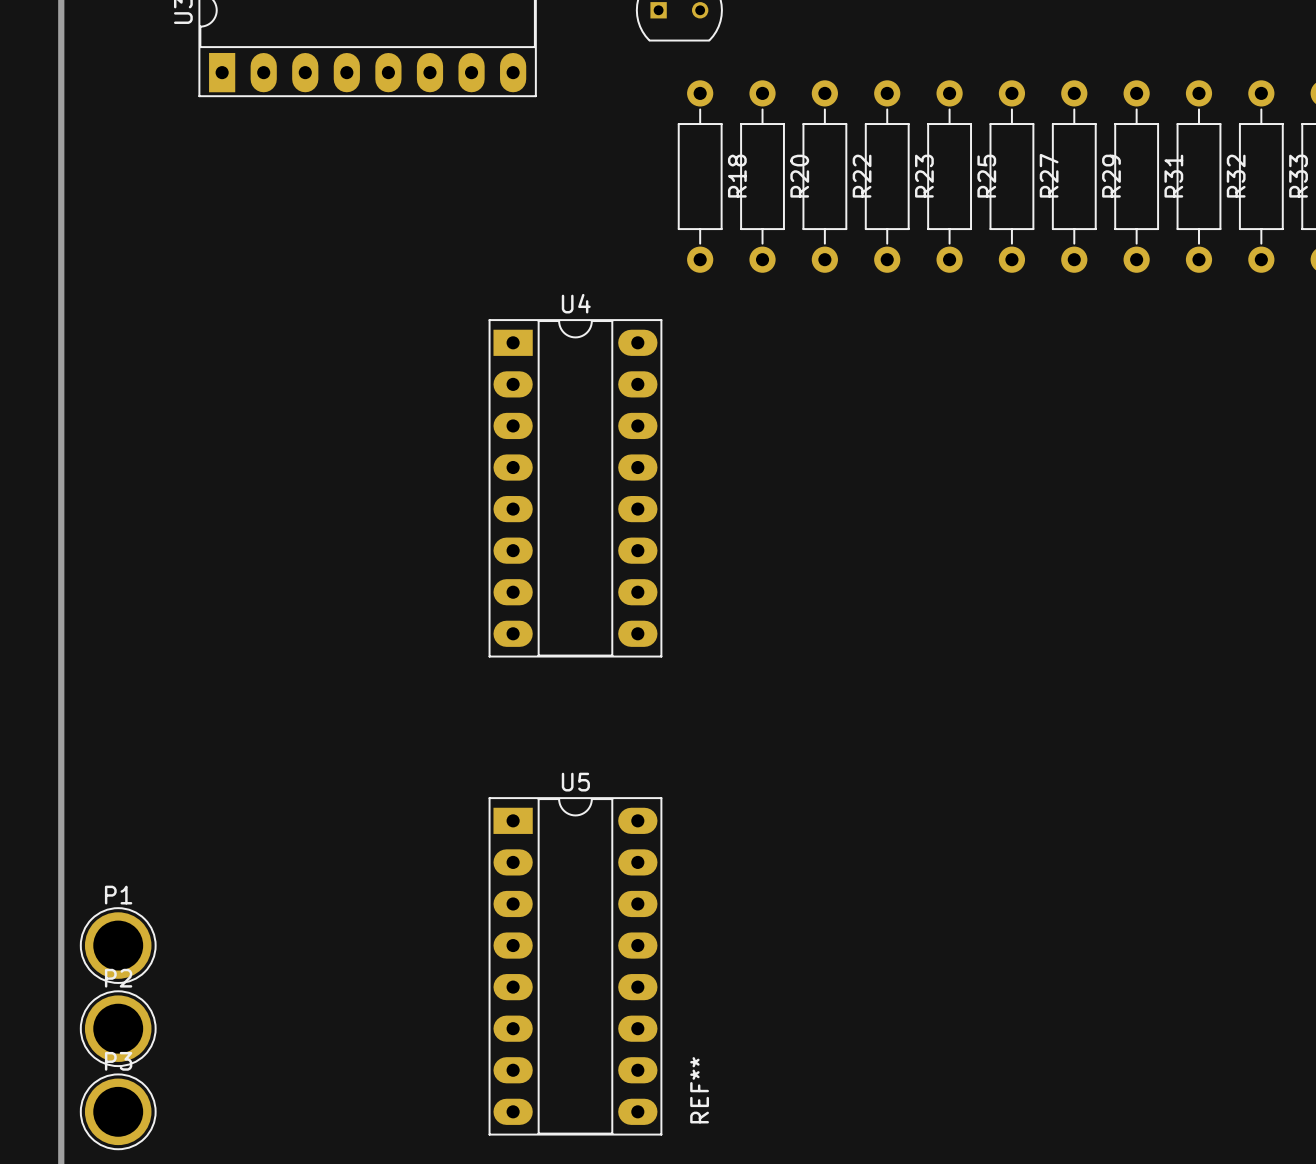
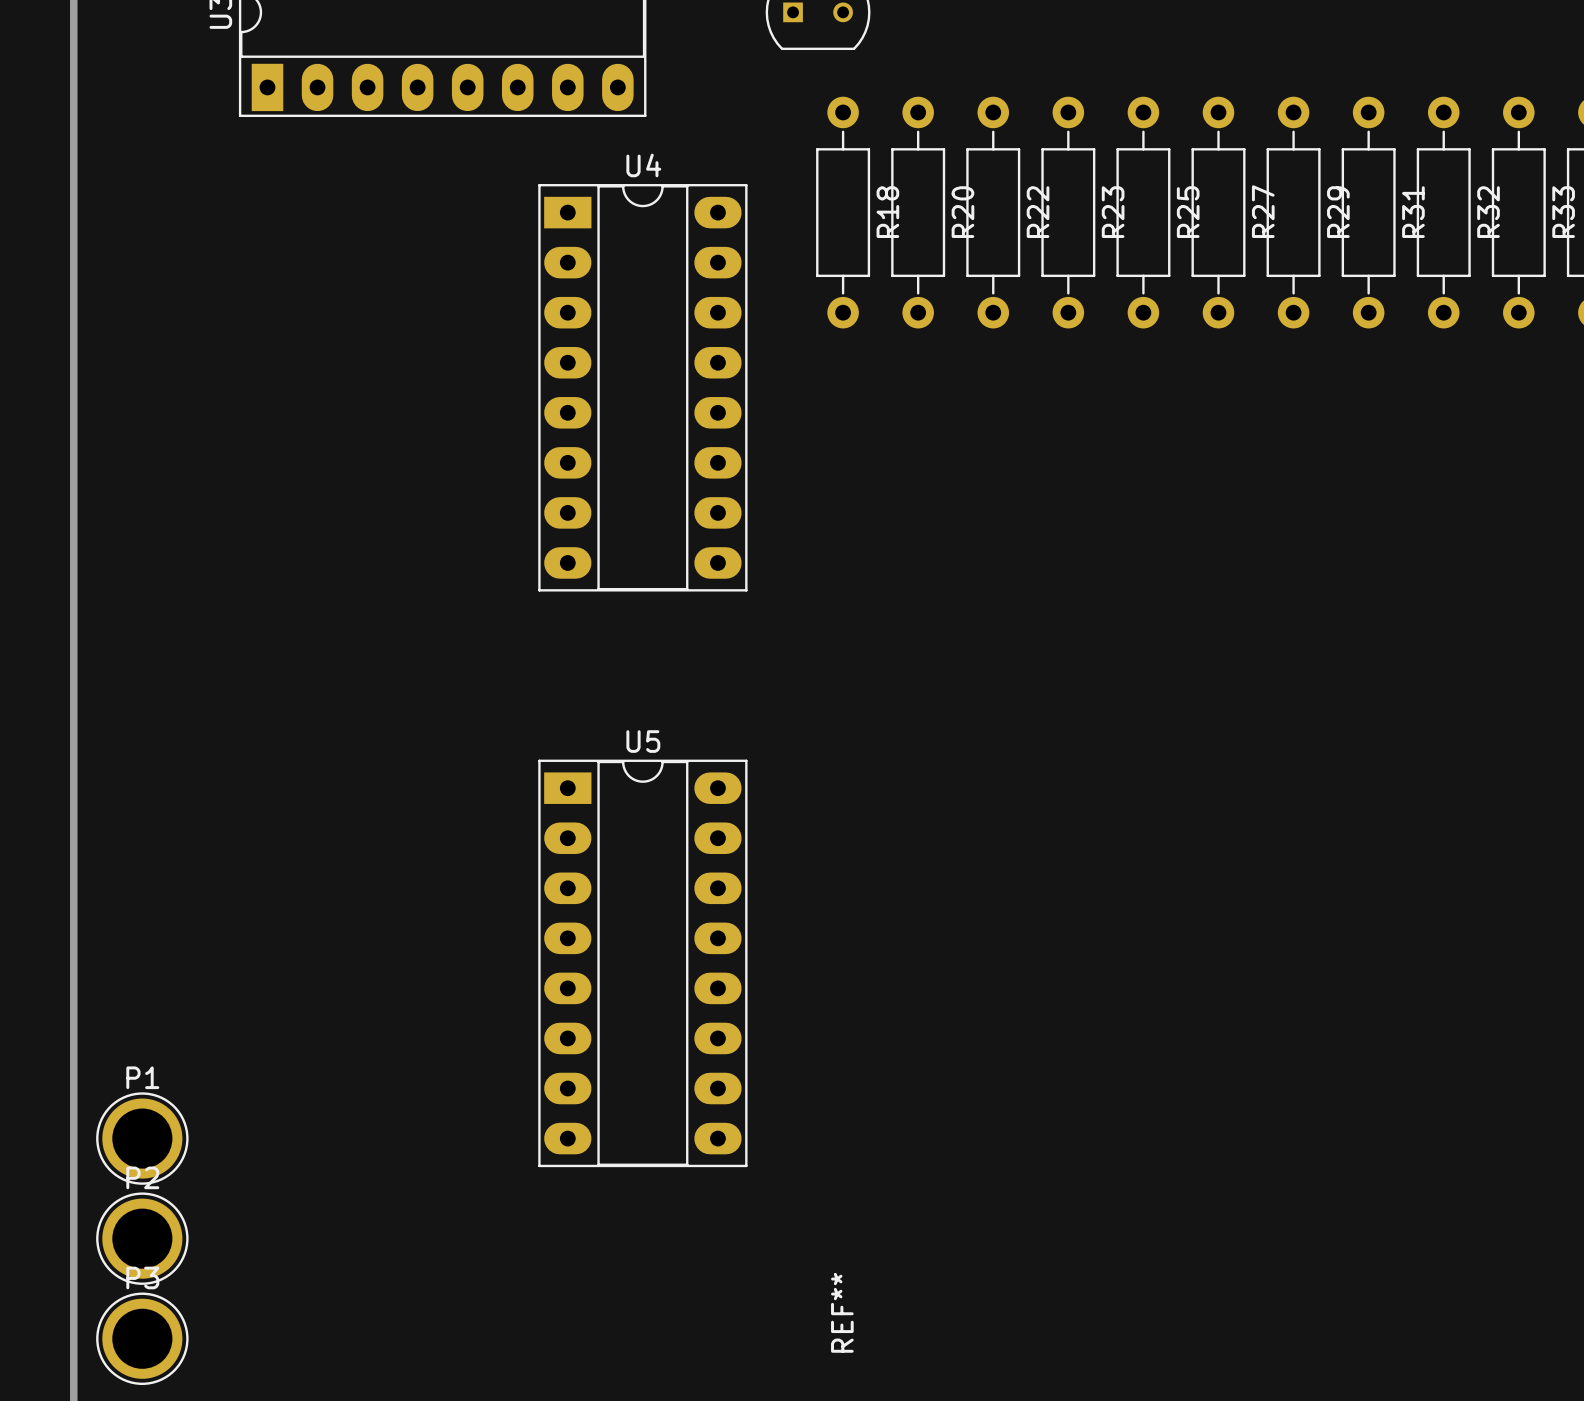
U4 position: (575, 488) -> (642, 387)
U5 position: (575, 966) -> (642, 963)

